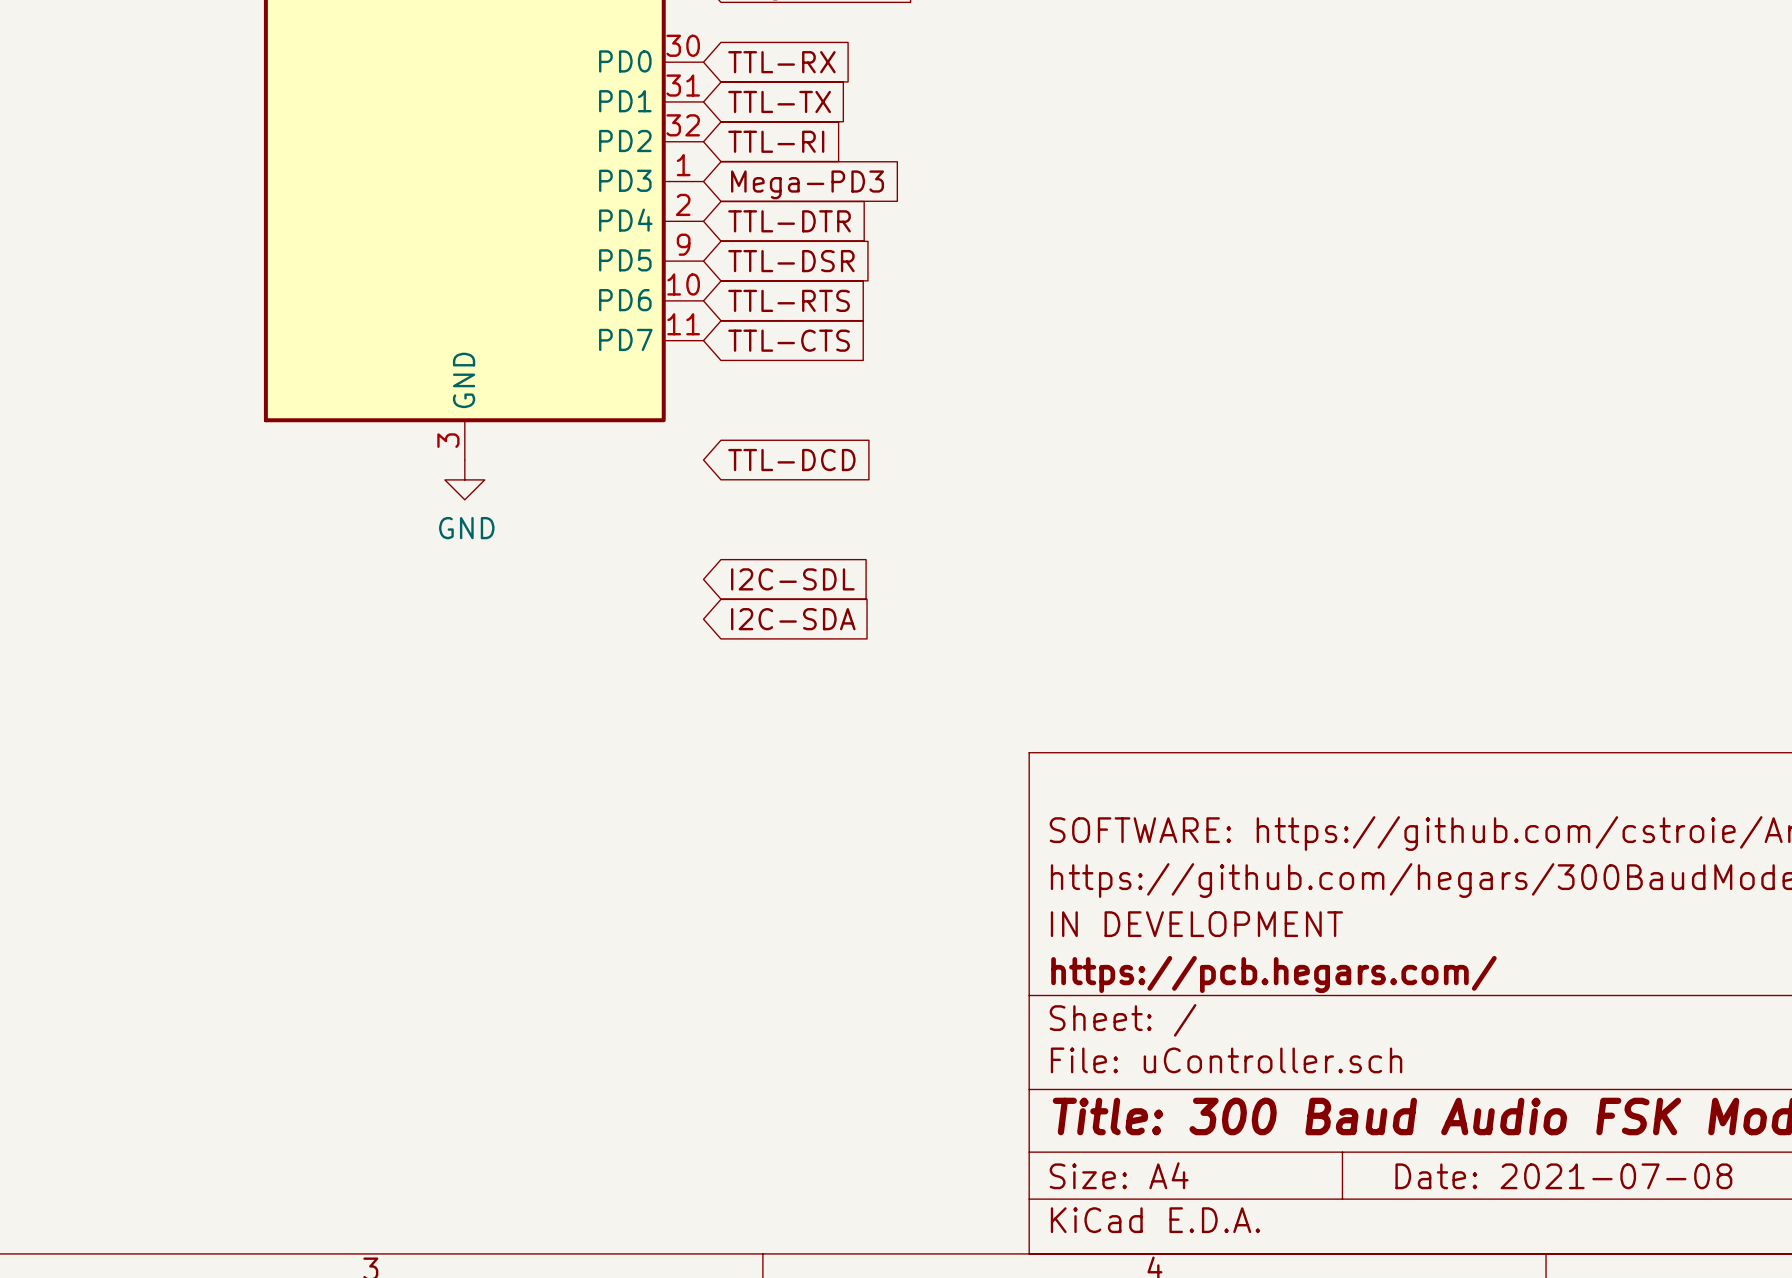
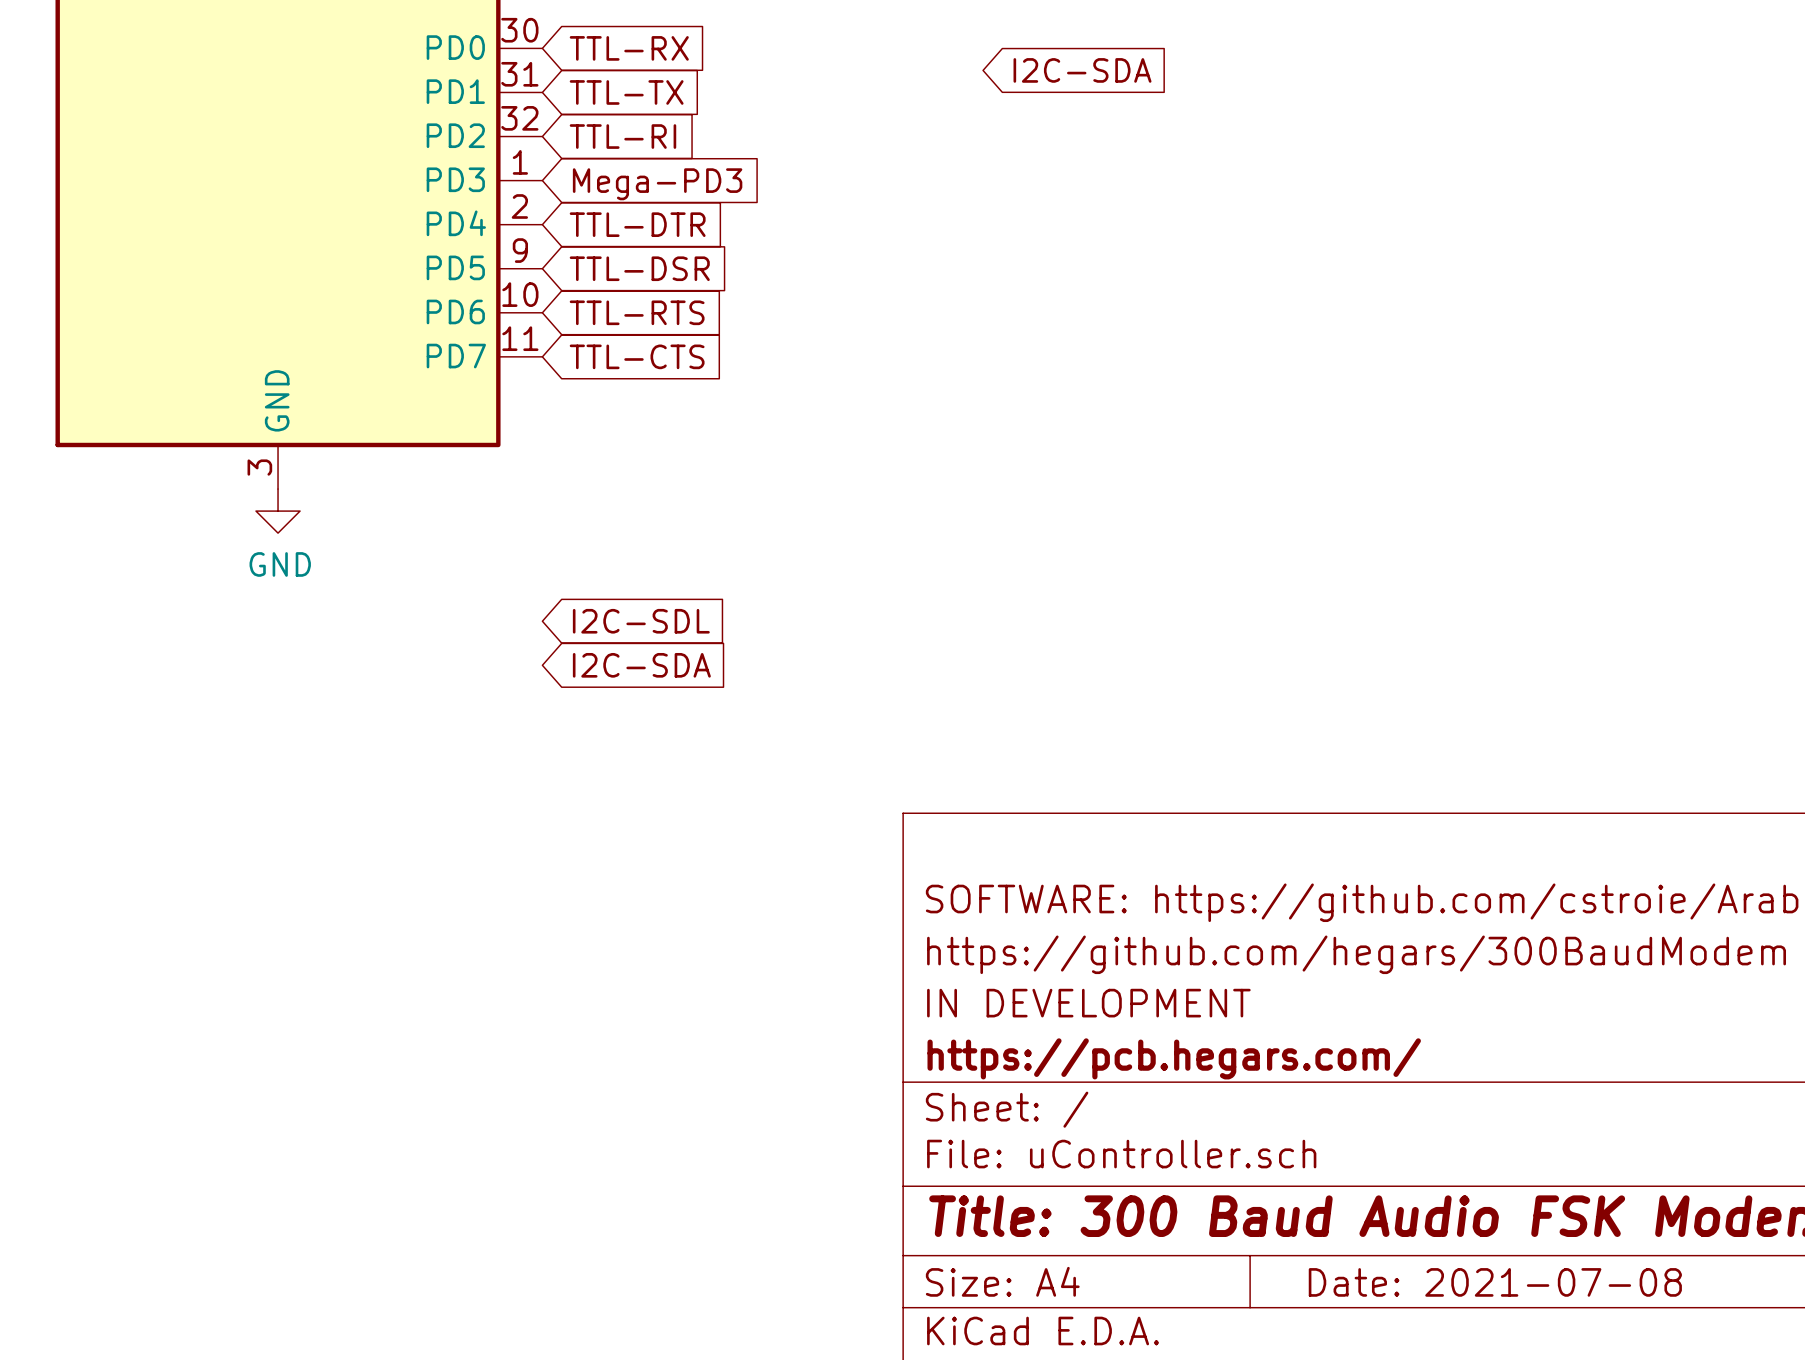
global label: none -> I2C-SDA (1082, 70)
global label: TTL-DCD (791, 460) -> none

